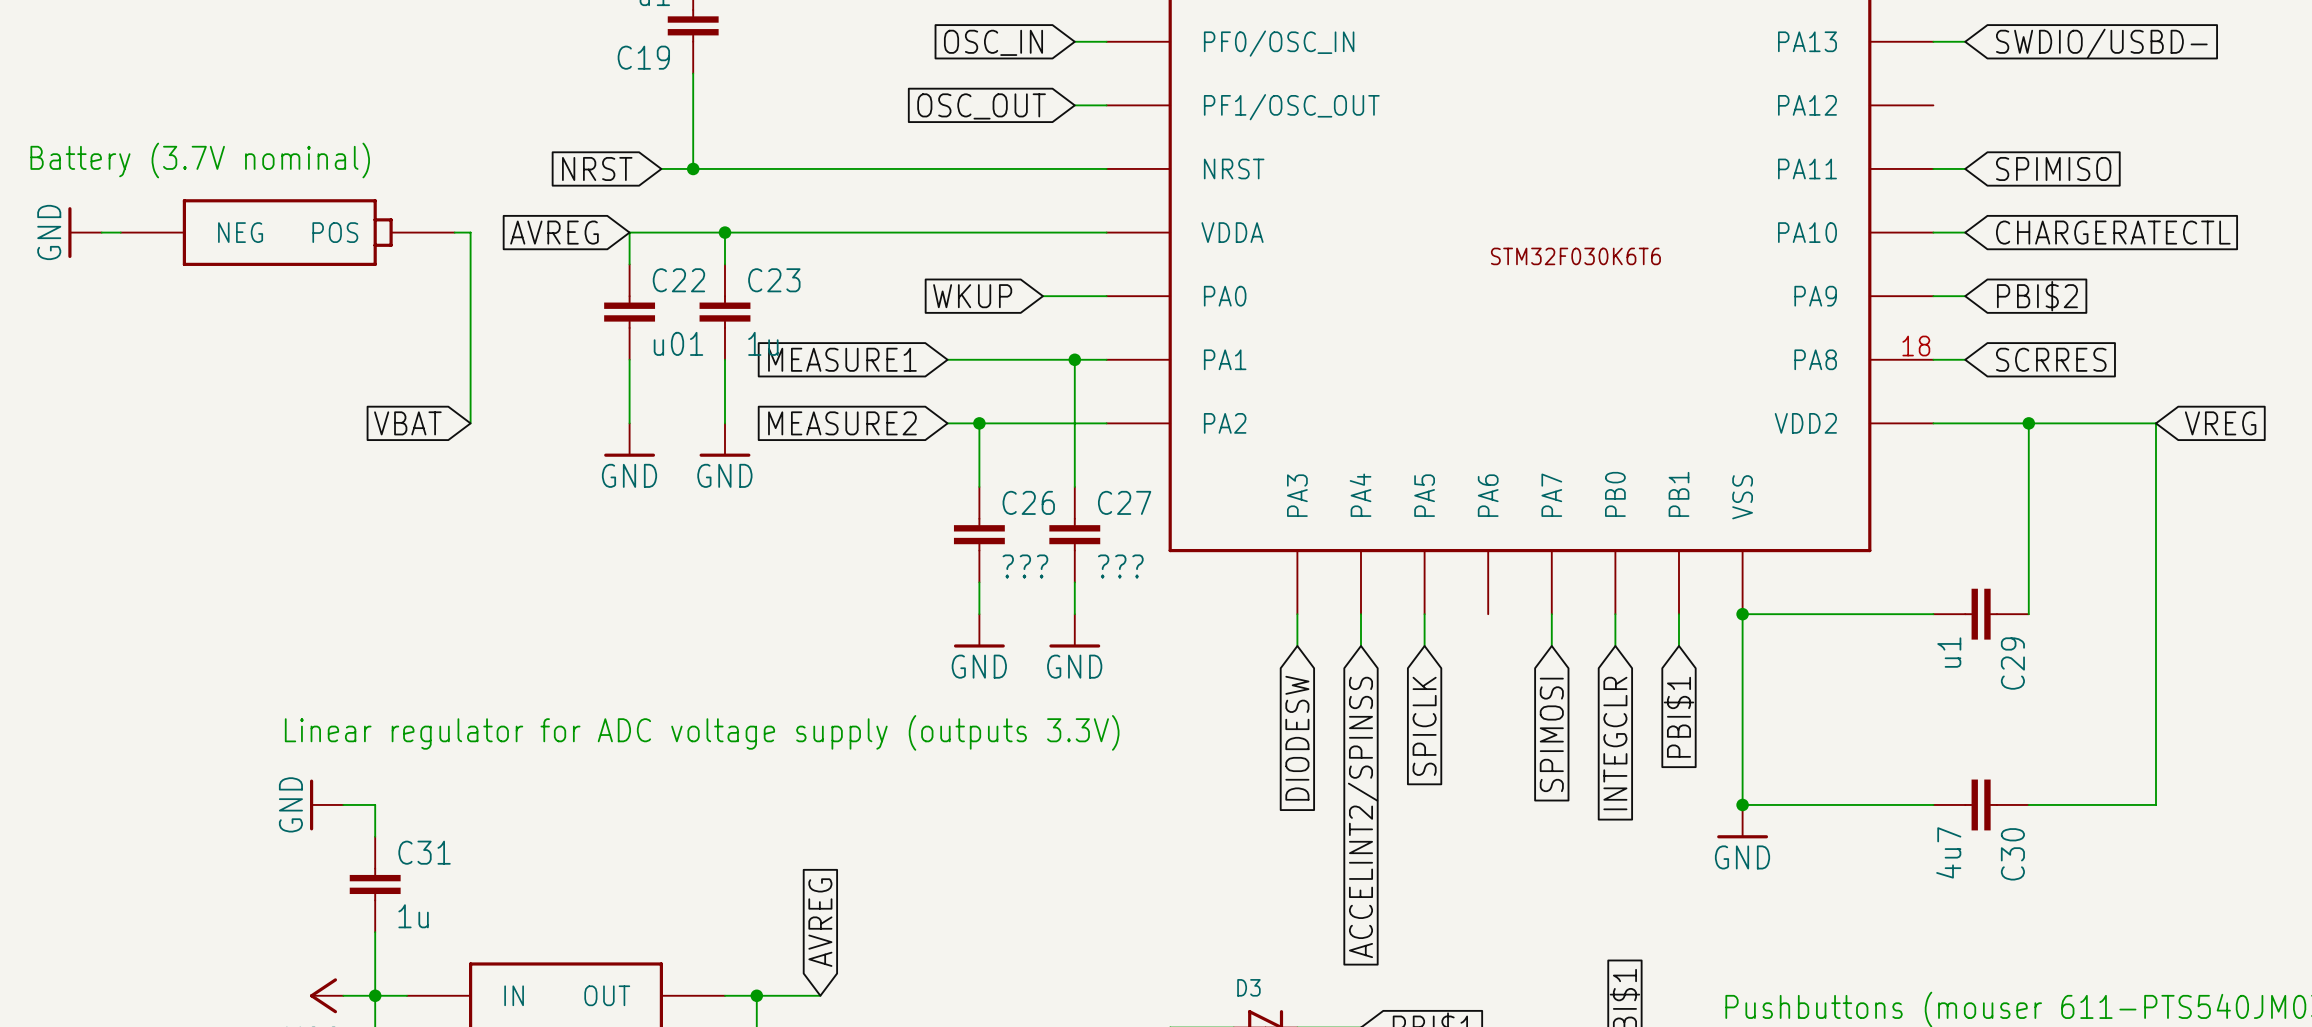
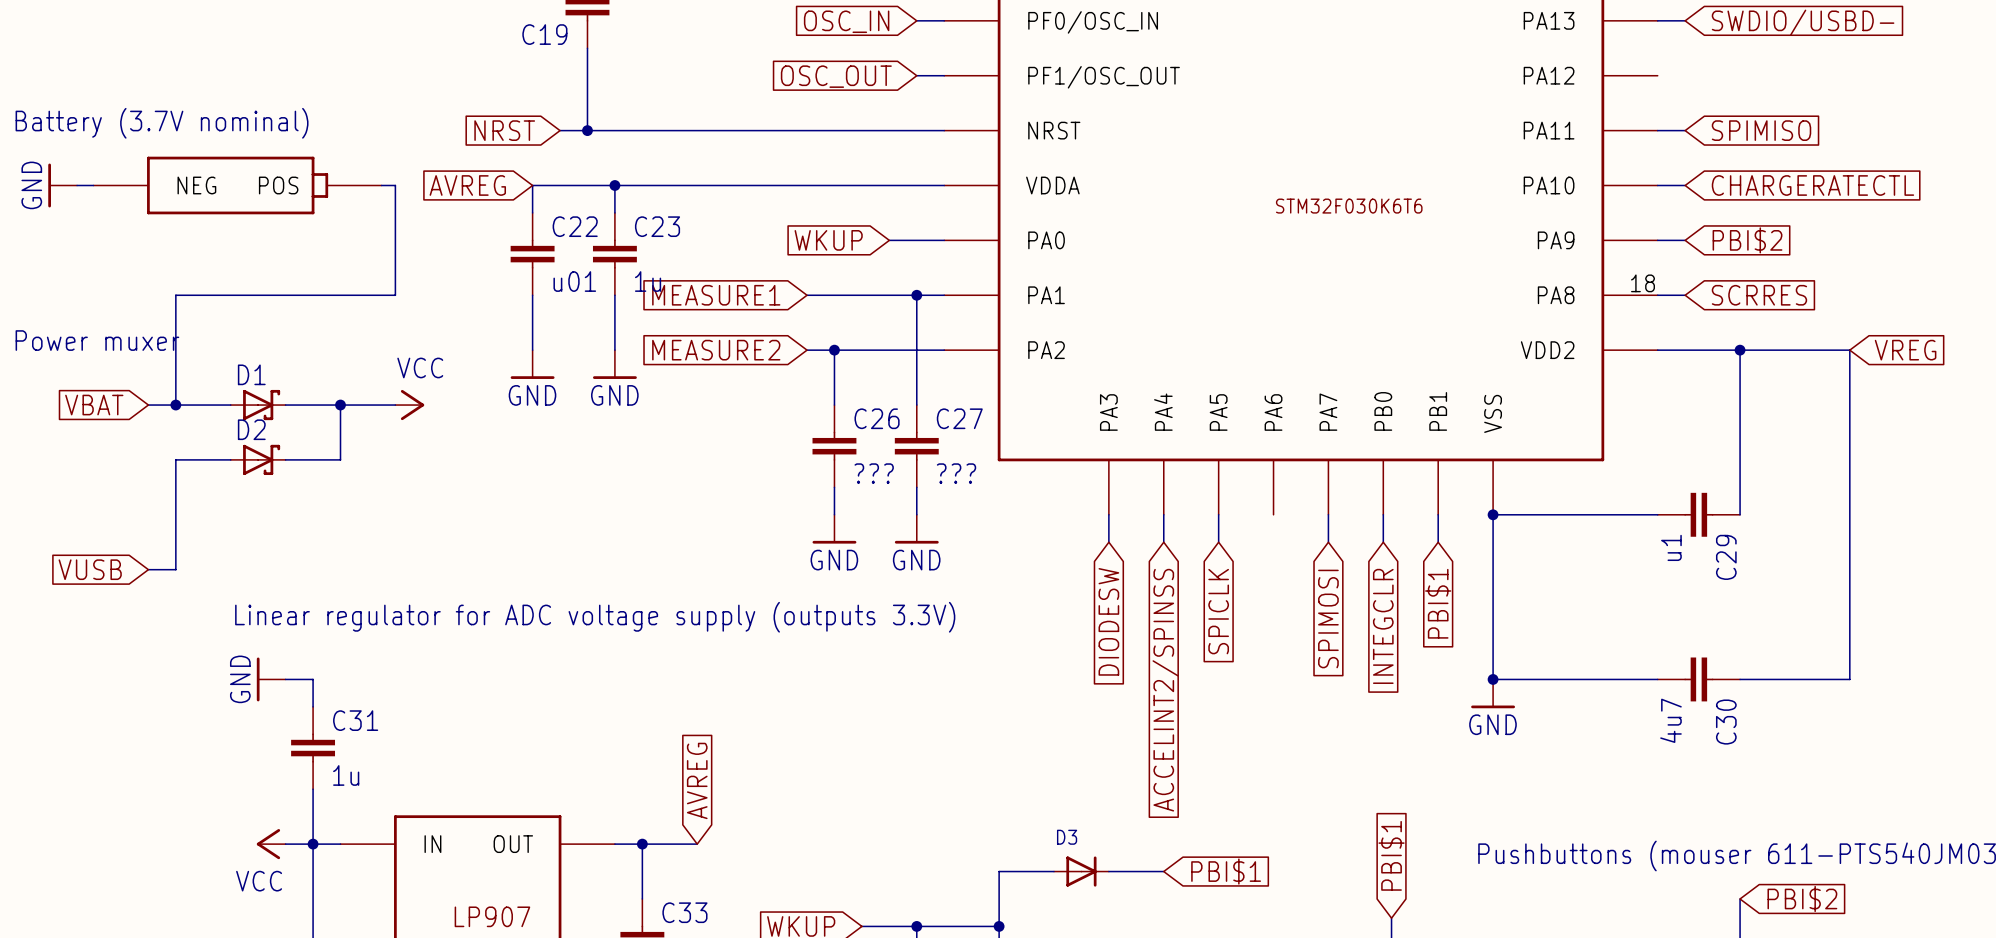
wire: (470, 359) (470, 423) -> (395, 295) (175, 295) (175, 405)
text: none -> Power muxer (97, 340)
global label position: VBAT (407, 423) -> VBAT (94, 405)
wire: none -> (148, 405) (230, 405)
junction: none -> (175, 405)
D1: none -> (258, 405)
wire: none -> (285, 405) (395, 405)
wire: none -> (340, 405) (340, 459) (285, 459)
junction: none -> (340, 405)
power symbol: none -> VCC (409, 405)
wire: none -> (230, 459) (175, 459) (175, 569) (148, 569)
D2: none -> (258, 459)
global label: none -> VUSB (90, 569)

